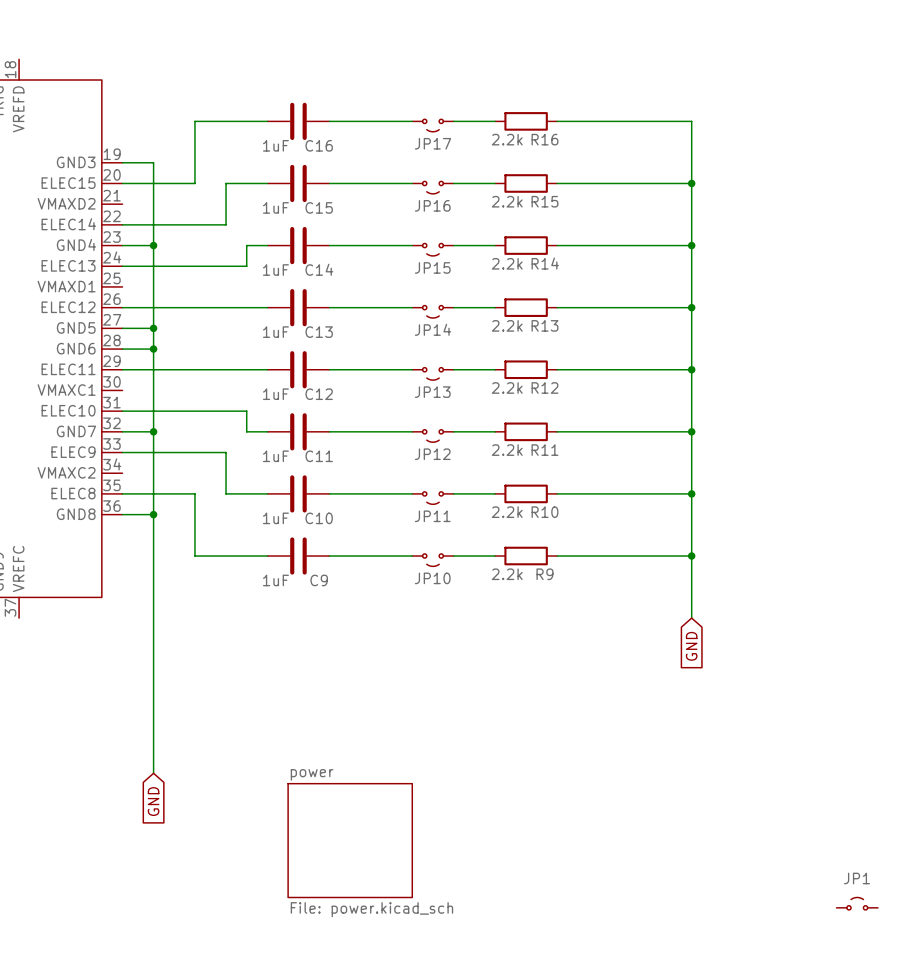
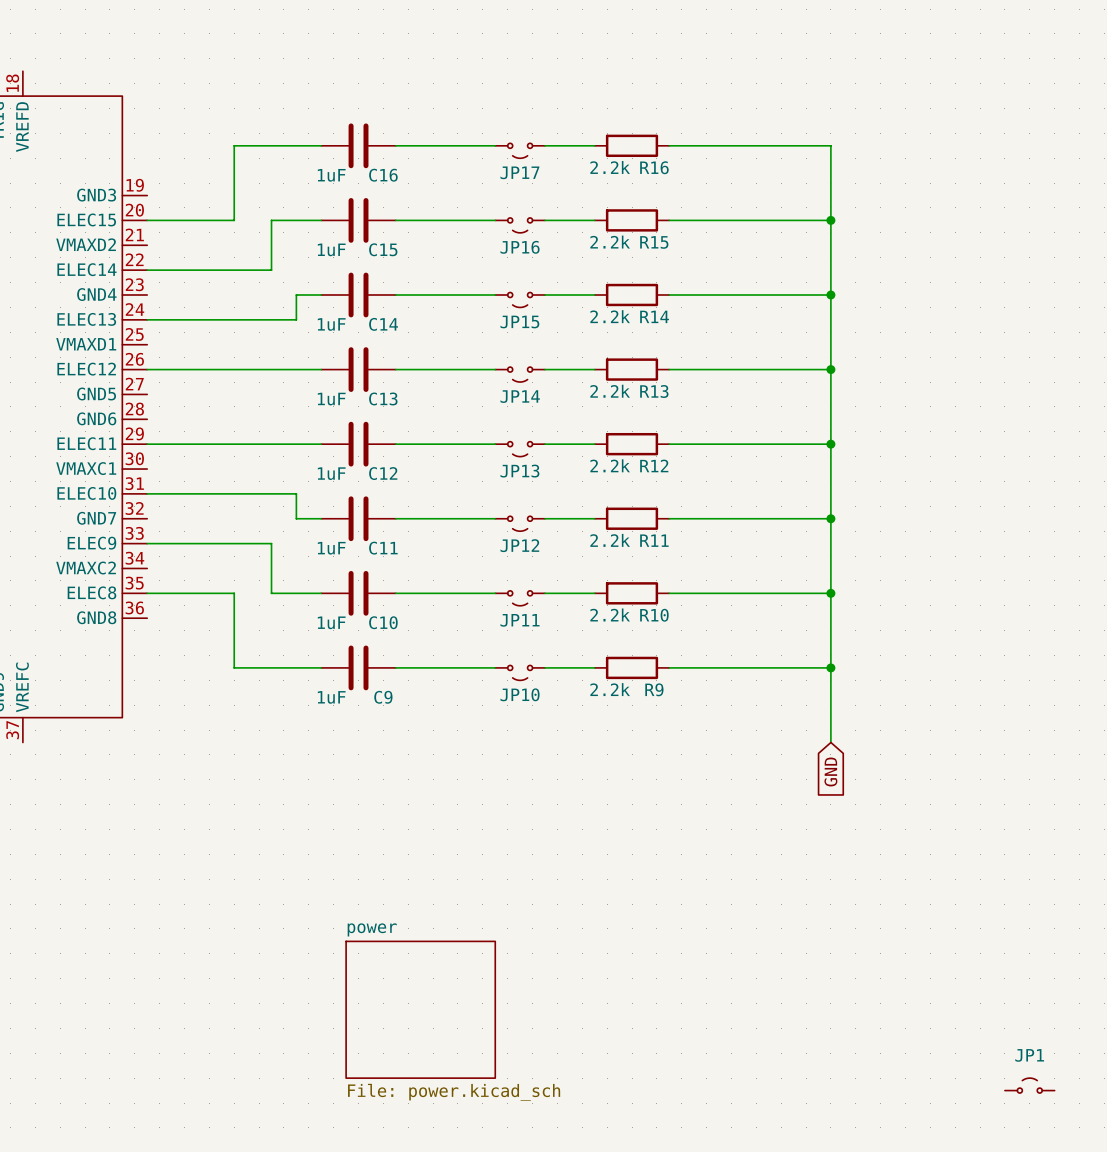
wire: (122, 162) (153, 162) (153, 773) -> none
wire: (122, 245) (153, 245) -> none
junction: (153, 245) -> none
wire: (122, 328) (153, 328) -> none
junction: (153, 328) -> none
wire: (122, 349) (153, 349) -> none
junction: (153, 349) -> none
wire: (122, 431) (153, 431) -> none
junction: (153, 431) -> none
wire: (122, 514) (153, 514) -> none
junction: (153, 514) -> none
global label: GND (153, 801) -> none

